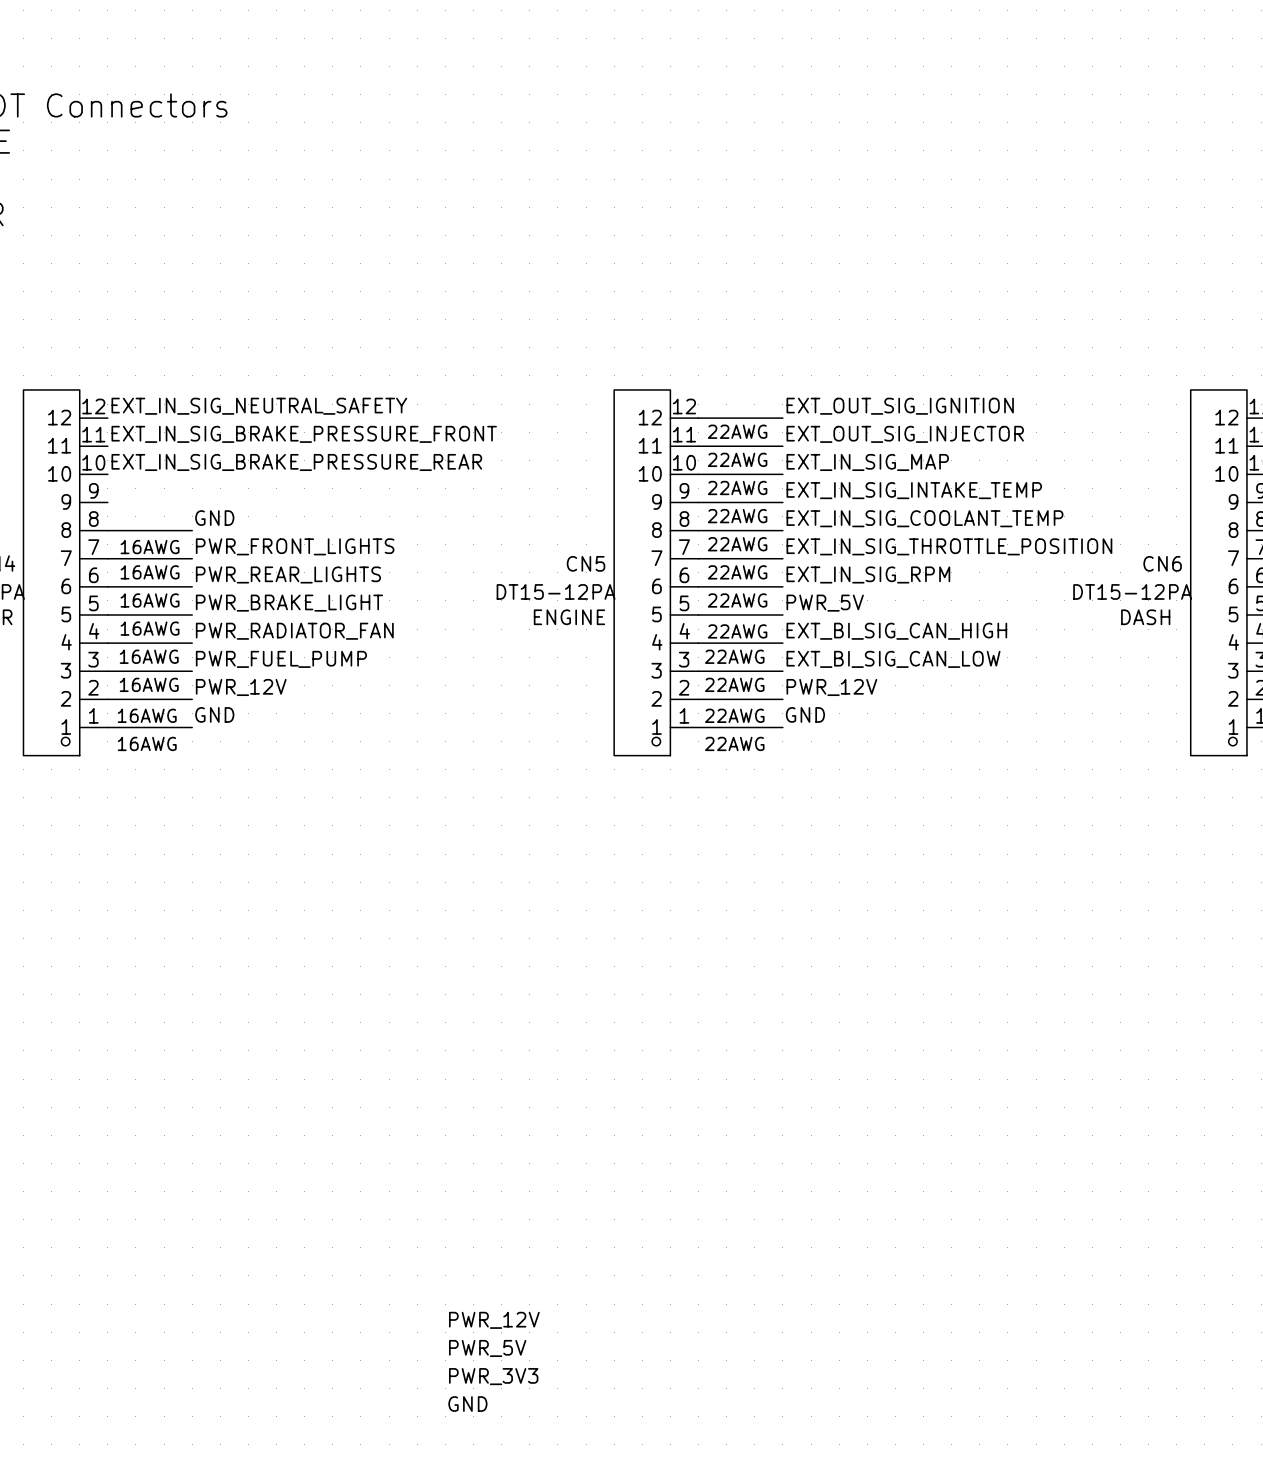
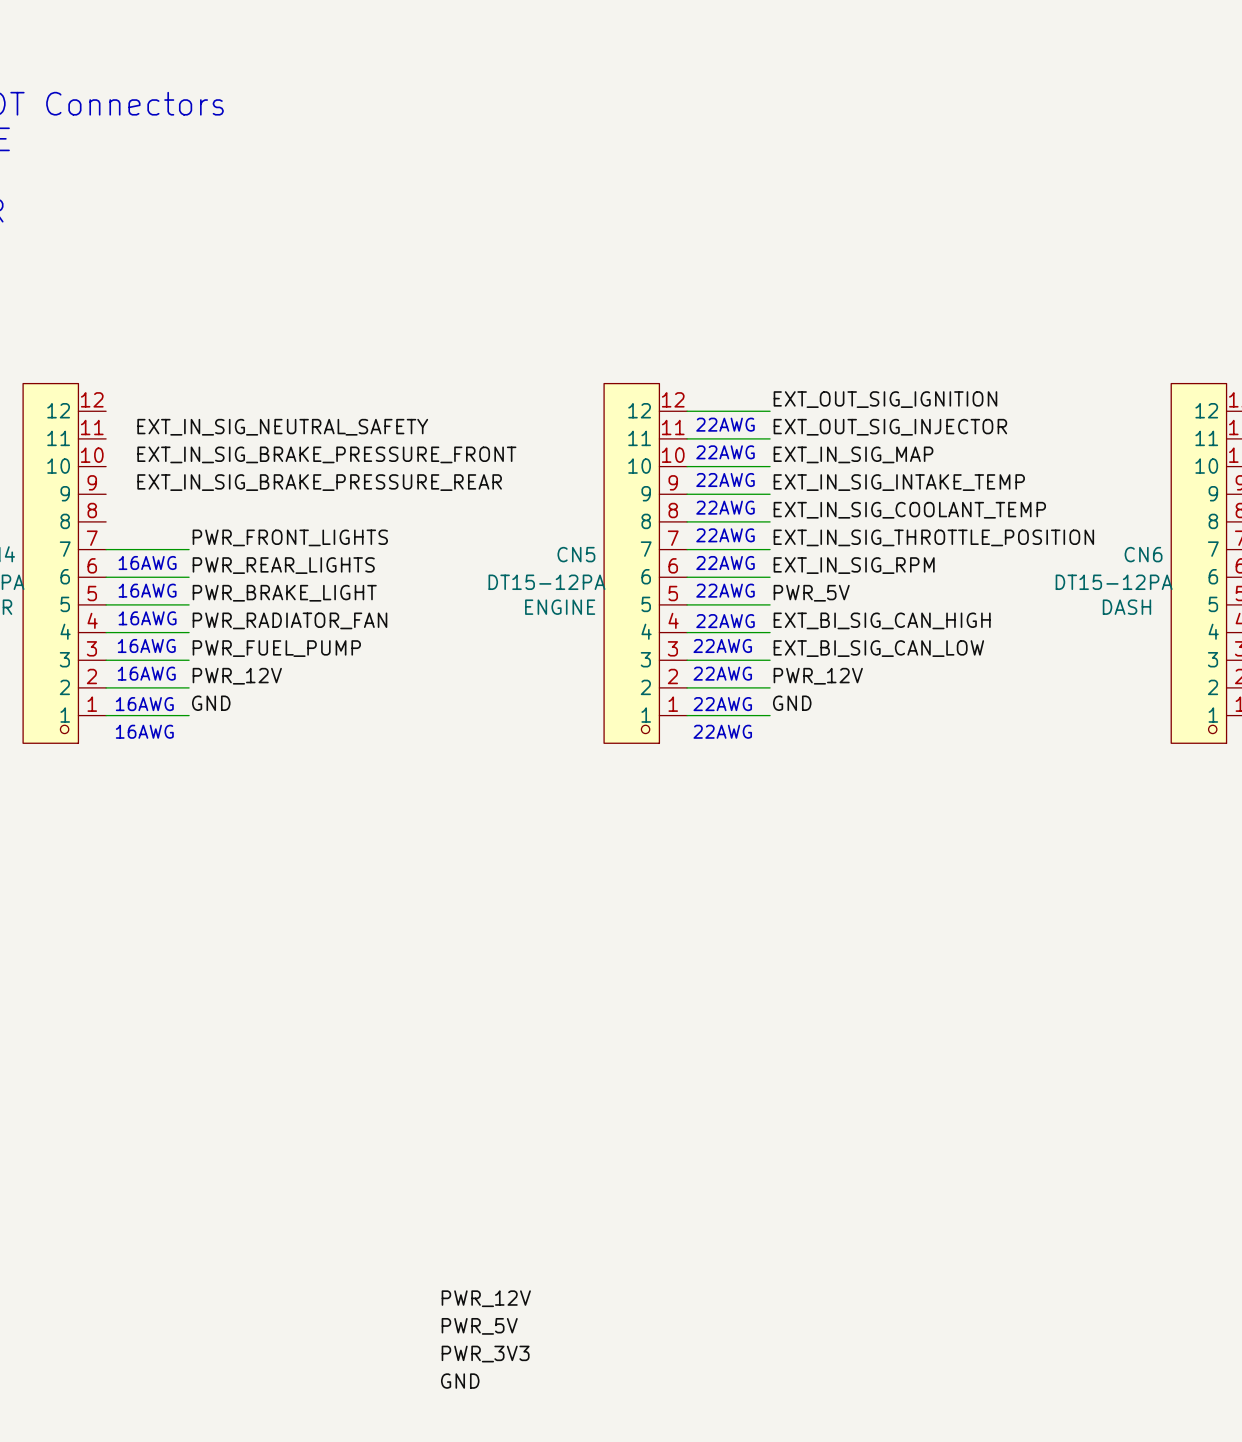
label position: EXT_IN_SIG_NEUTRAL_SAFETY (259, 406) -> EXT_IN_SIG_NEUTRAL_SAFETY (282, 427)
label position: EXT_IN_SIG_BRAKE_PRESSURE_FRONT (304, 434) -> EXT_IN_SIG_BRAKE_PRESSURE_FRONT (326, 454)
label position: EXT_IN_SIG_BRAKE_PRESSURE_REAR (296, 462) -> EXT_IN_SIG_BRAKE_PRESSURE_REAR (319, 482)
label: GND (214, 518) -> none
wire: (107, 530) (192, 530) -> none
text: 16AWG (150, 547) -> none

